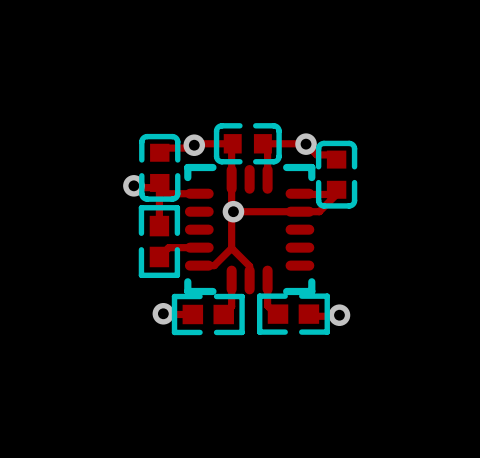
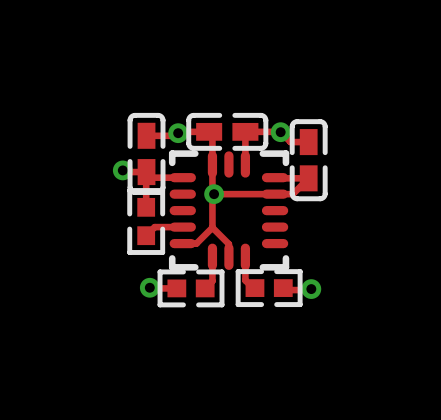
part footprint: [213, 123, 282, 165] -> [186, 112, 269, 151]
part footprint: [139, 133, 181, 202] -> [127, 112, 166, 195]
part footprint: [315, 140, 358, 209] -> [289, 119, 328, 202]

